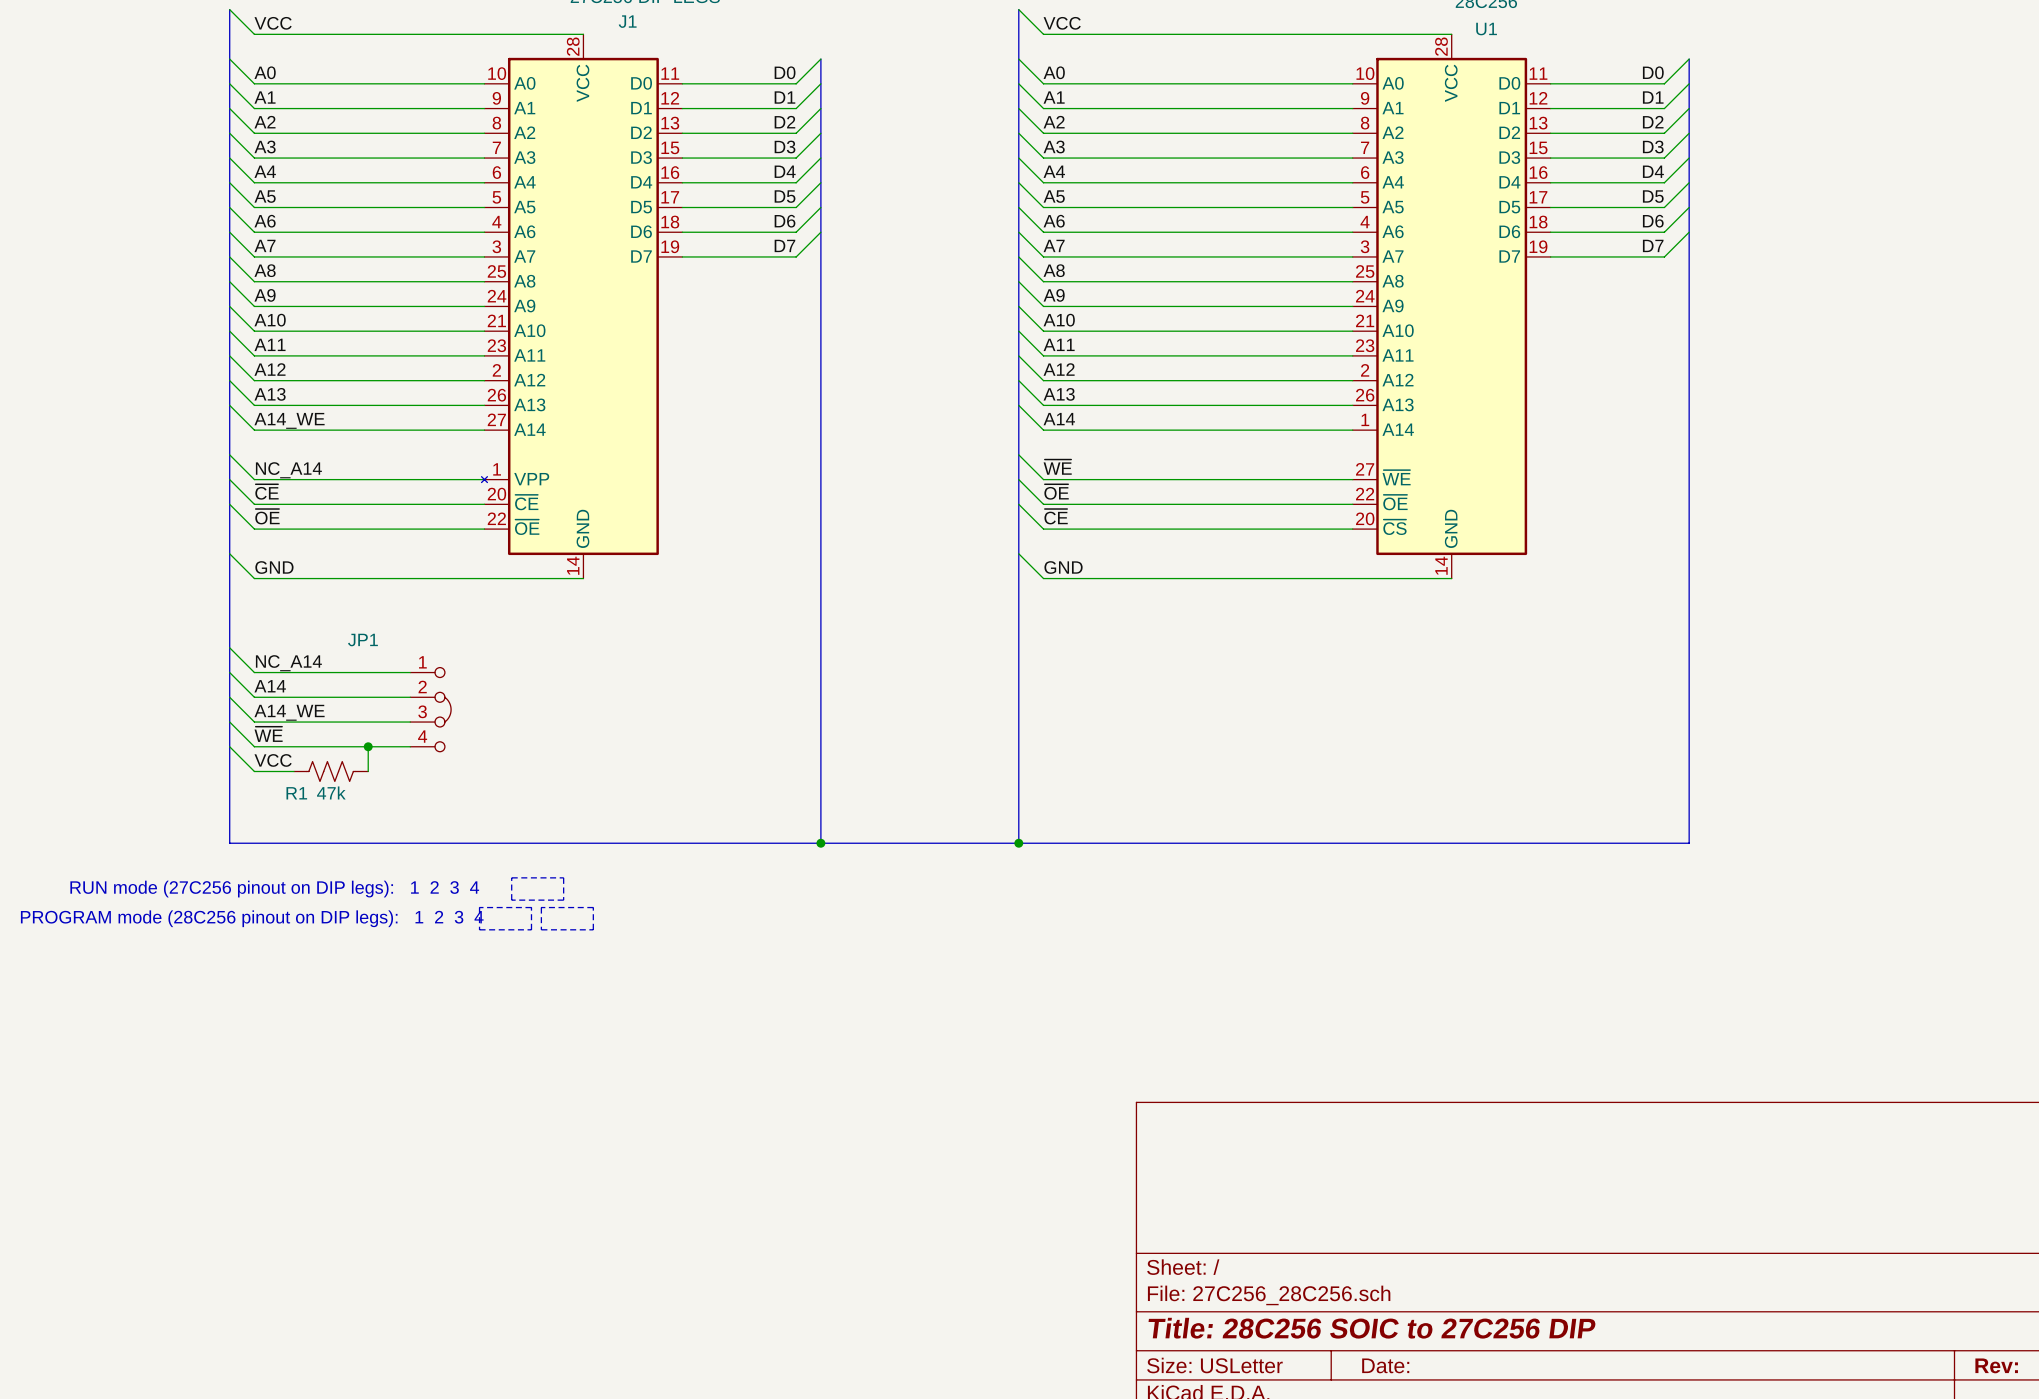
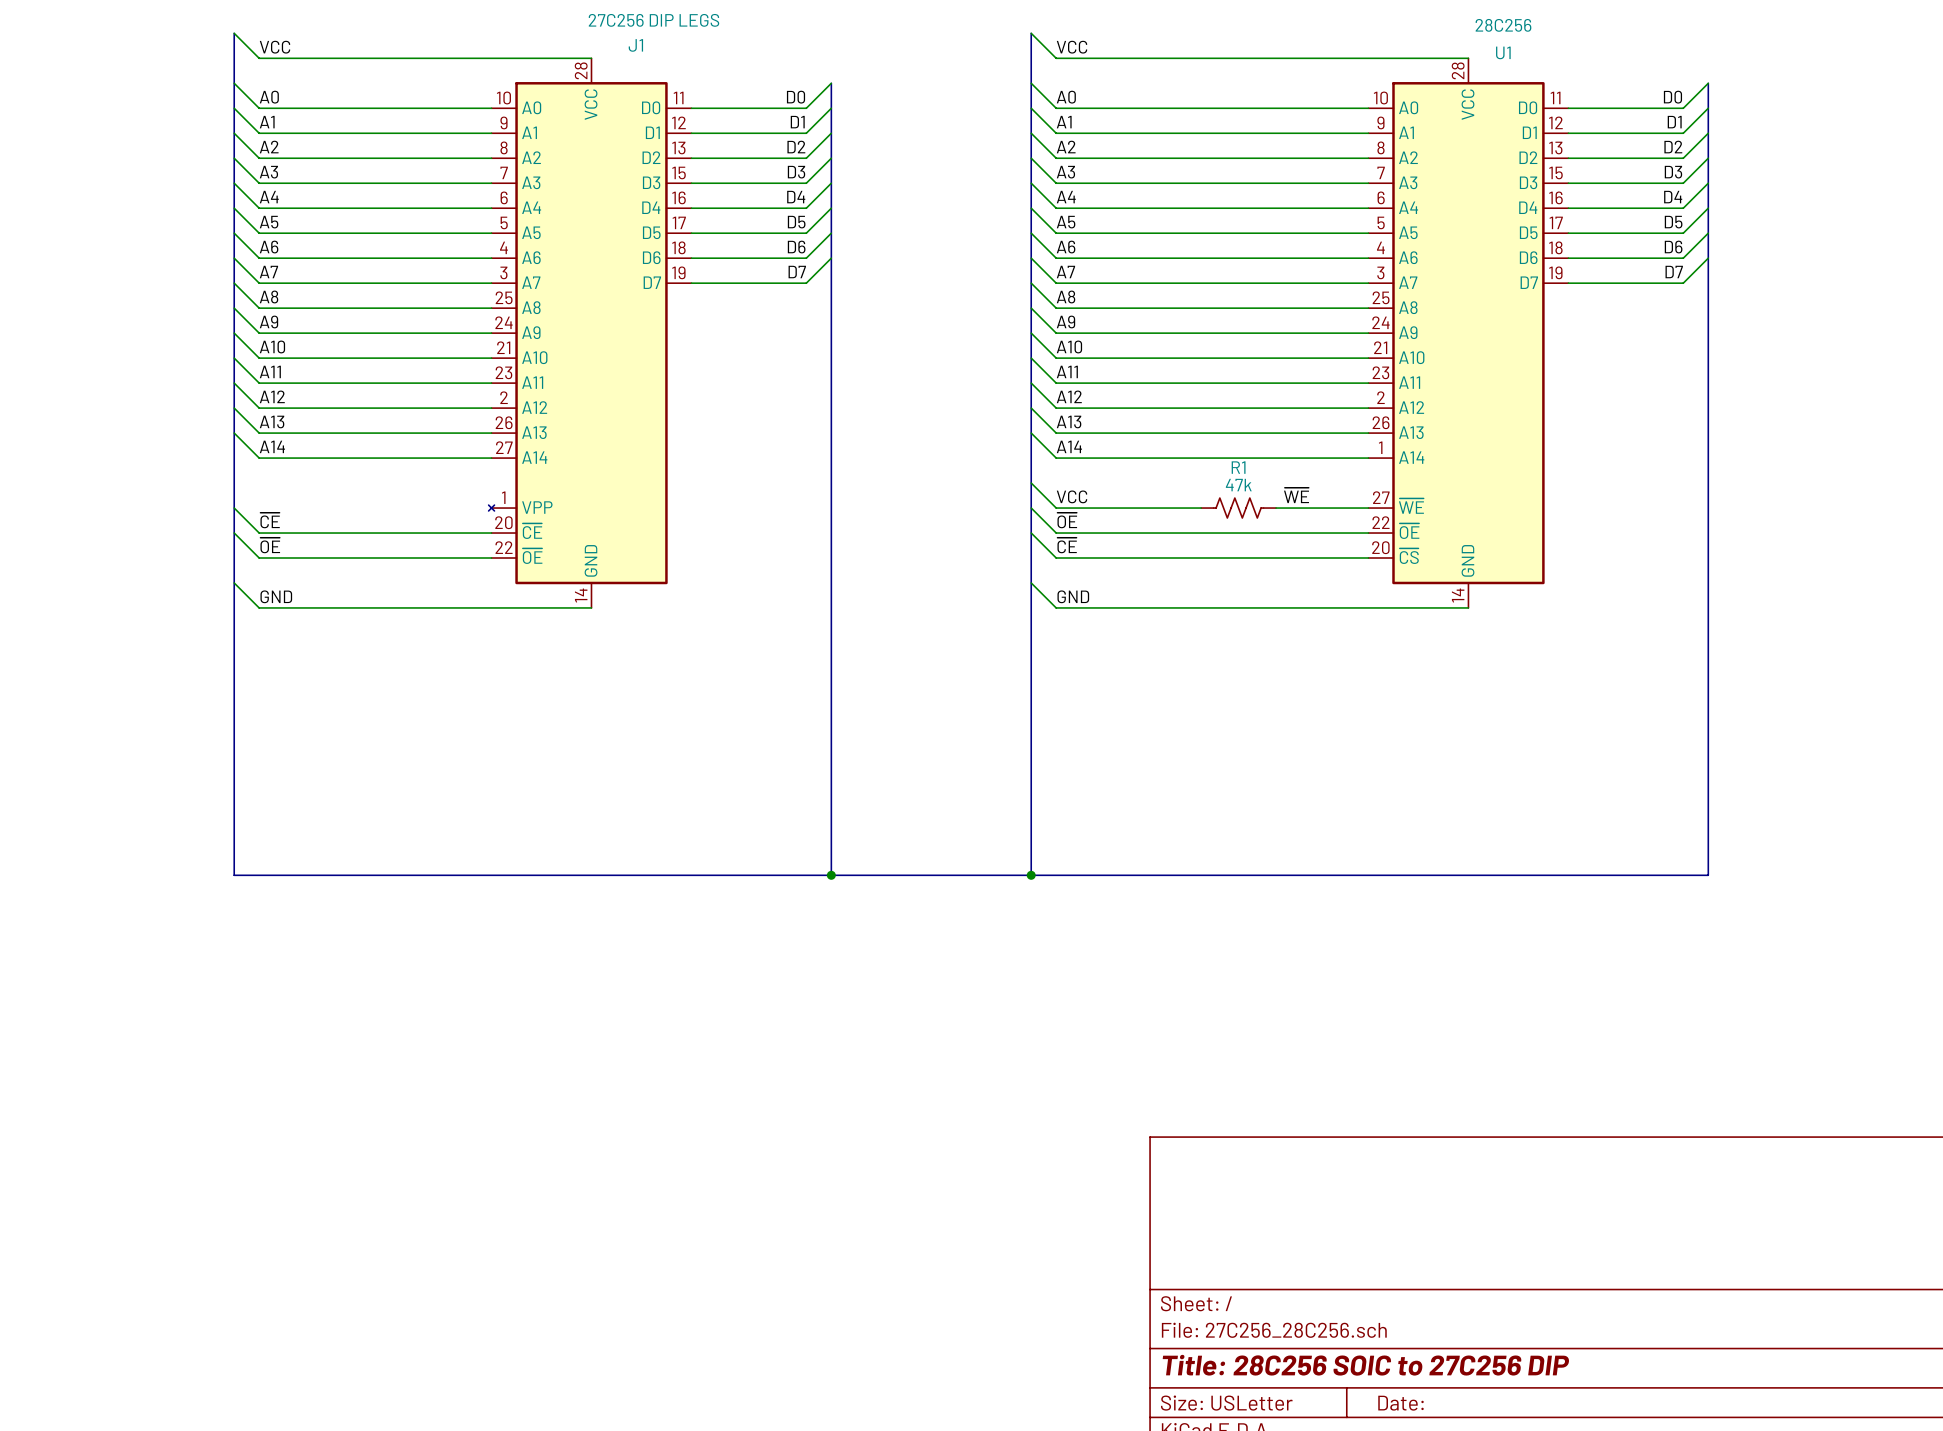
label: A14_WE (289, 420) -> A14 (272, 446)
wire: (229, 454) (254, 479) (484, 479) -> none
label: ~{WE} (1057, 467) -> VCC (1072, 496)
label: none -> ~{WE} (1296, 495)
label: NC_A14 (288, 470) -> none
wire: (229, 647) (254, 672) (410, 672) -> none
label: NC_A14 (288, 663) -> none
wire: (229, 672) (254, 697) (410, 697) -> none
label: A14 (270, 686) -> none
wire: (229, 697) (254, 722) (410, 722) -> none
JP1: (430, 709) -> none
label: A14_WE (289, 712) -> none
wire: (229, 722) (254, 746) (410, 746) -> none
label: ~{WE} (268, 734) -> none
wire: (229, 746) (254, 771) (294, 771) -> none
wire: (368, 746) (368, 771) -> none
junction: (368, 746) -> none
label: VCC (273, 760) -> none
R1 position: (331, 771) -> (1238, 508)
R1 value position: 47k (331, 792) -> 47k (1238, 485)
R1 name position: R1 (296, 793) -> R1 (1238, 467)
line: (511, 877) (511, 900) (563, 900) (563, 877) (511, 877) -> none
text: RUN mode (27C256 pinout on DIP legs): 1 2 3 4 (274, 889) -> none
line: (479, 907) (531, 907) (531, 929) (479, 929) (479, 907) -> none
line: (541, 907) (593, 907) (593, 929) (541, 929) (541, 907) -> none
text: PROGRAM mode (28C256 pinout on DIP legs): 1 2 3 4 (252, 918) -> none

